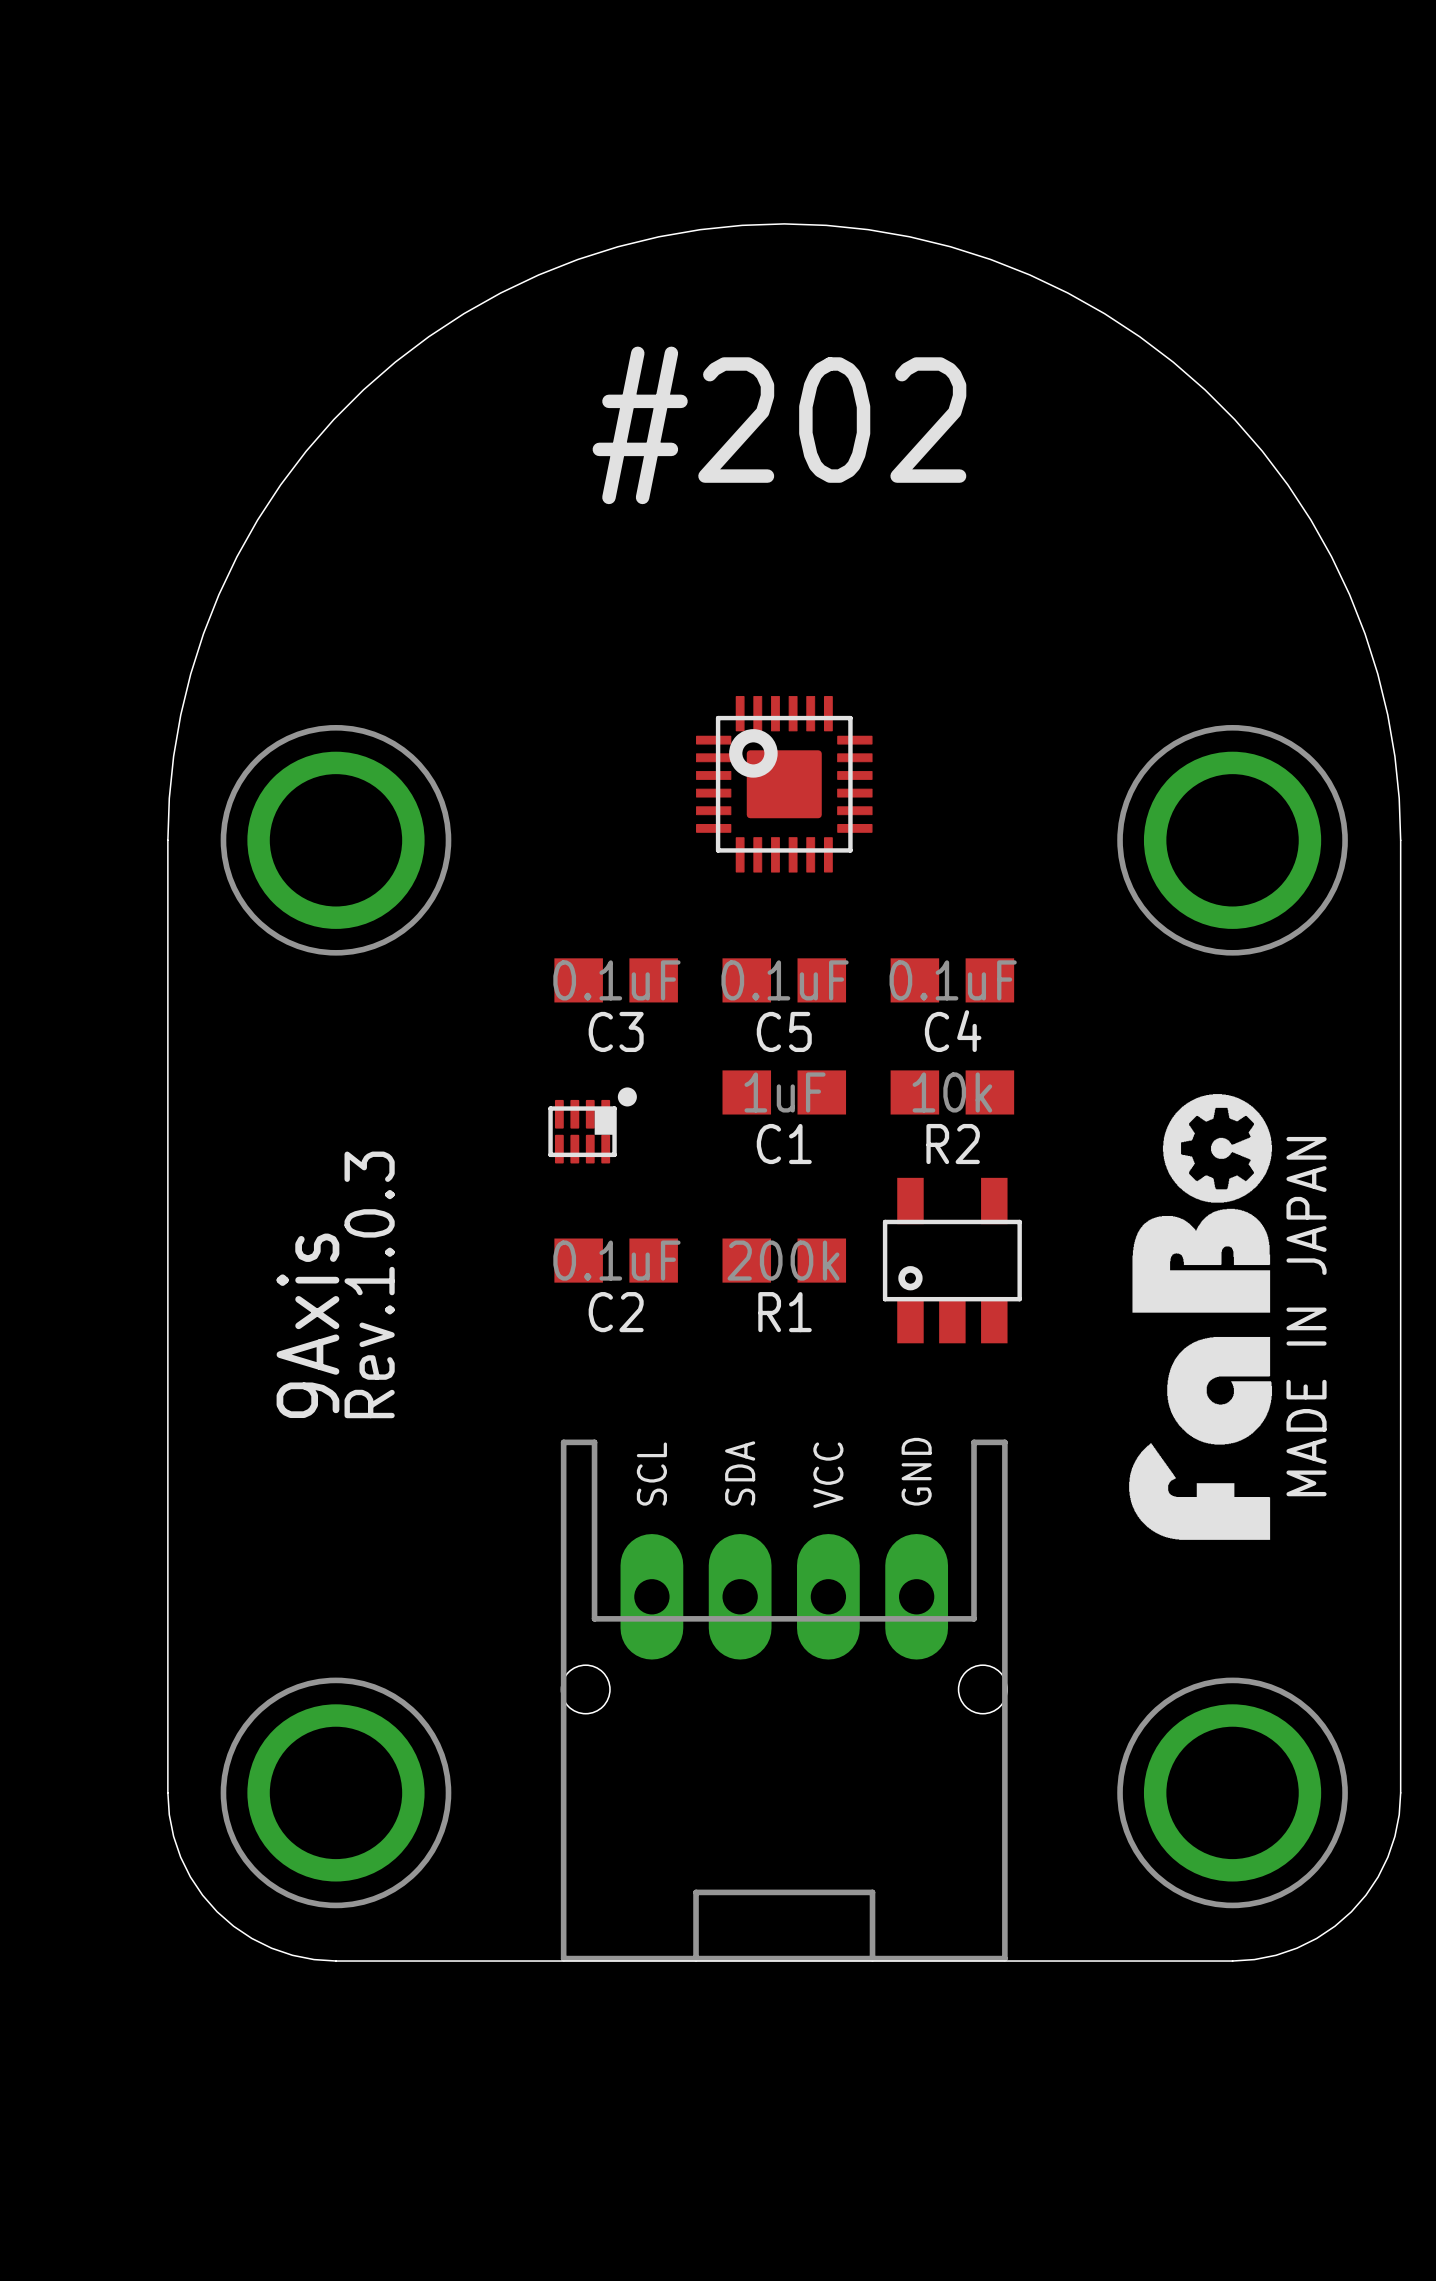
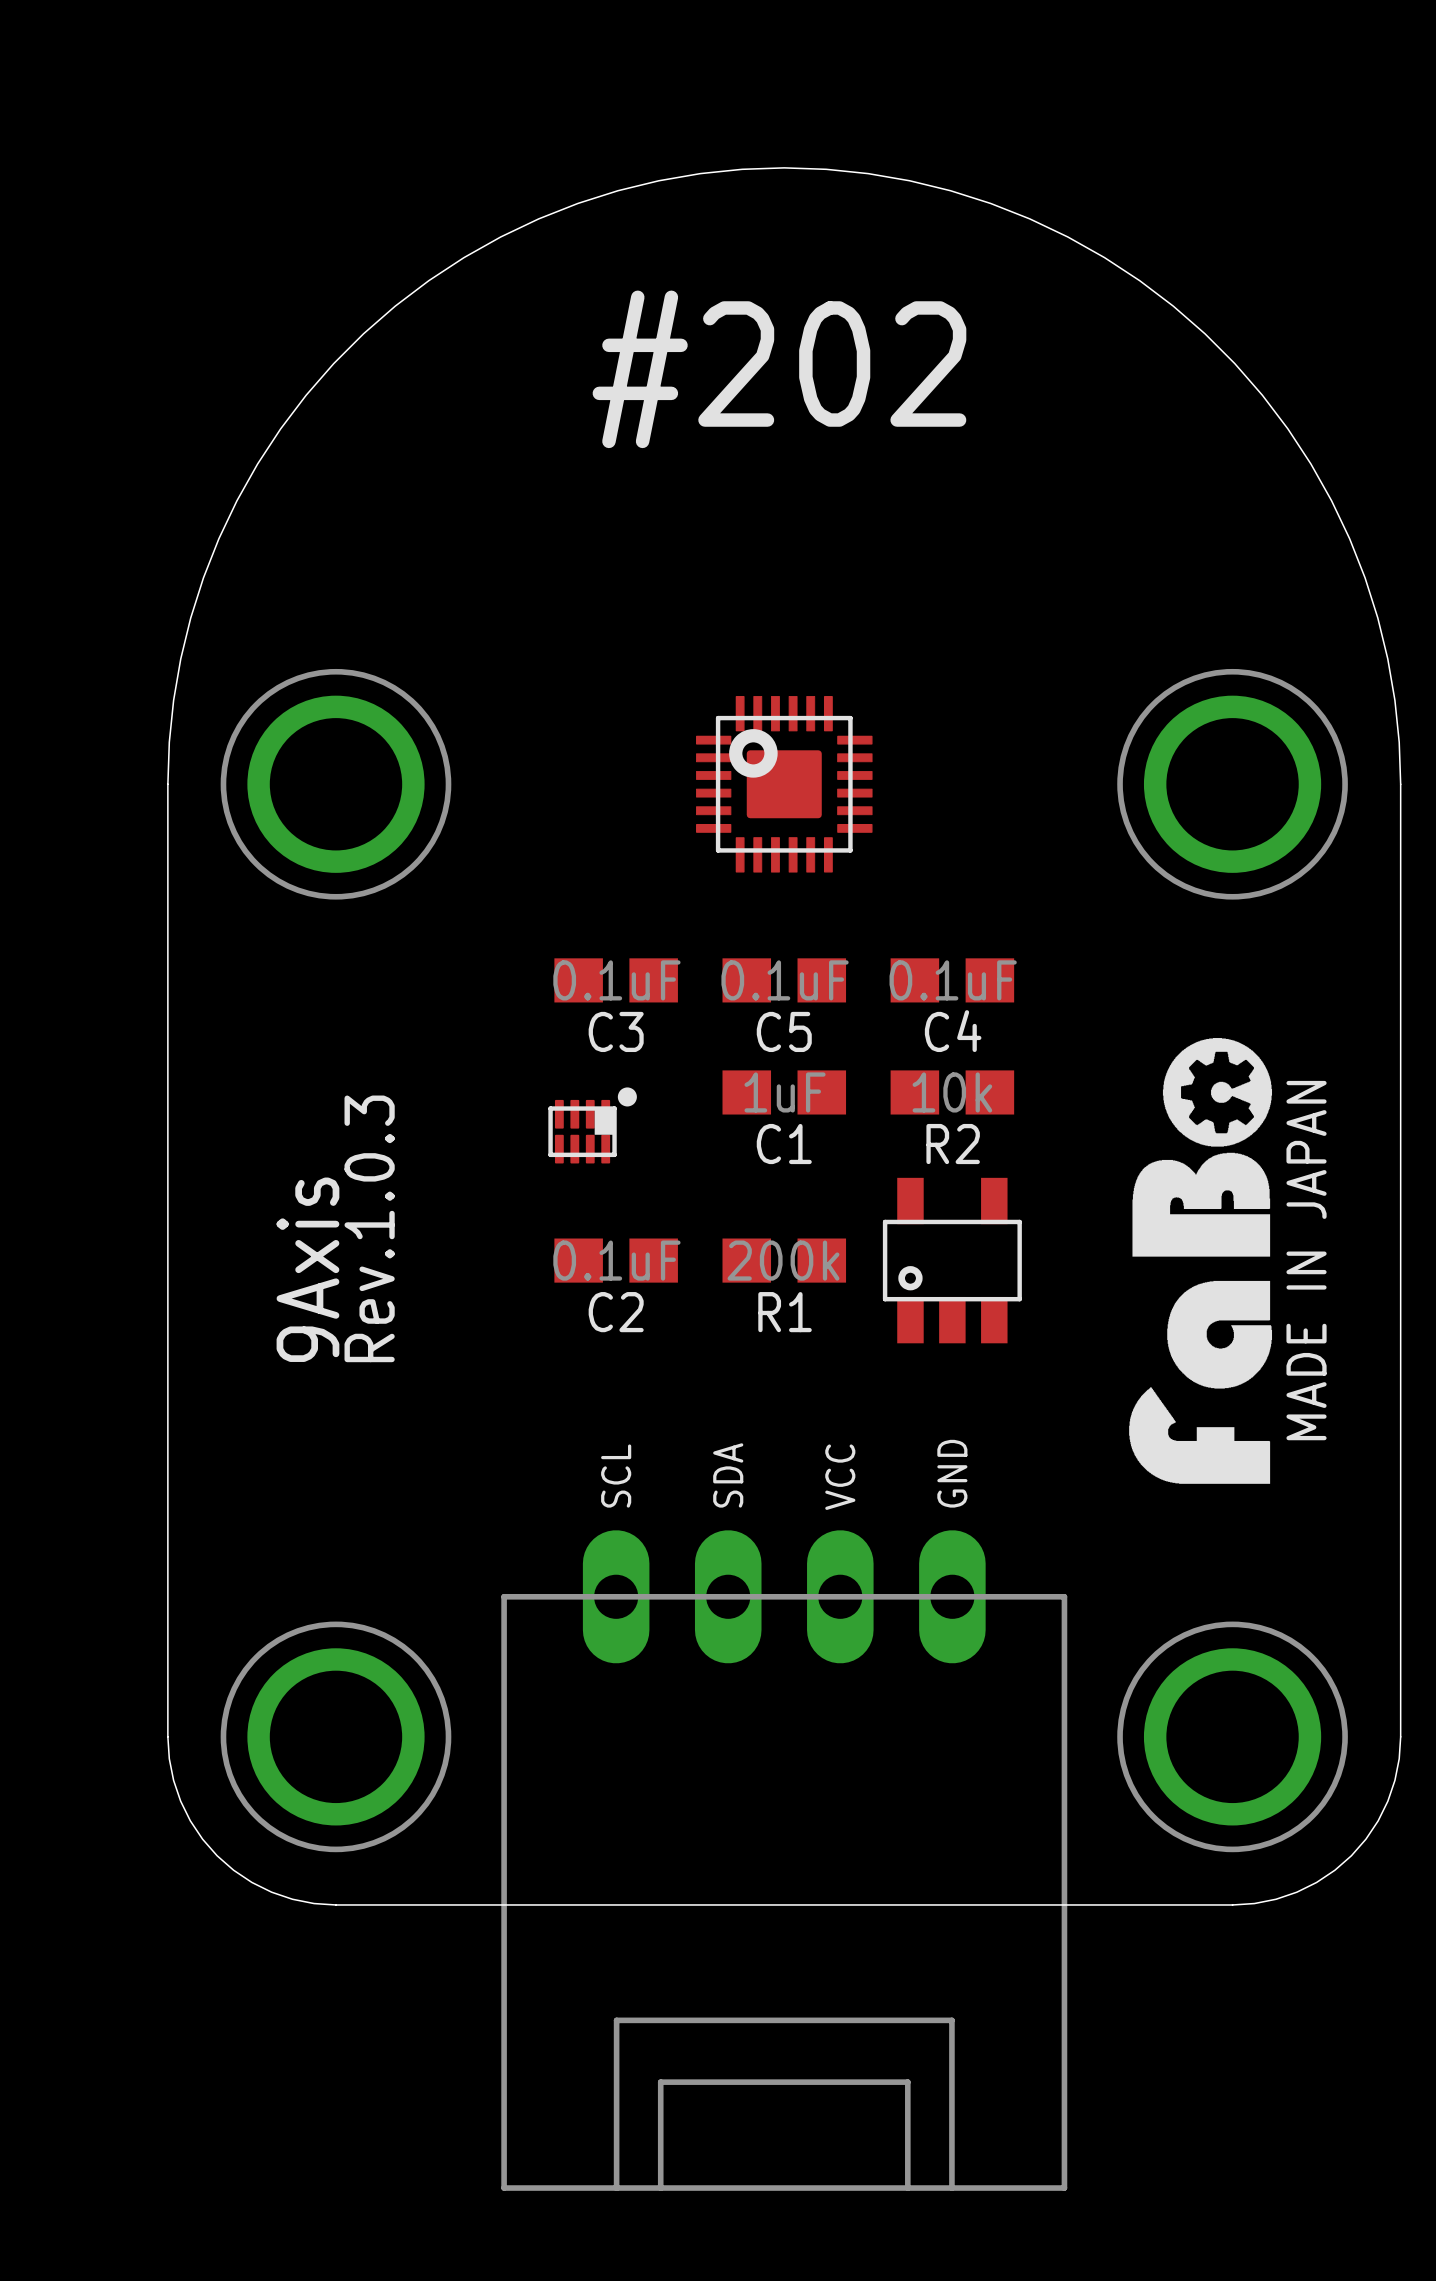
text position: #202 (779, 425) -> #202 (779, 369)
part: (784, 1092) -> none
part: none -> (784, 1179)
text position: Rev.1.0.3 (369, 1284) -> Rev.1.0.3 (369, 1228)
drawing position: (1200, 1316) -> (1200, 1260)
text position: MADE IN JAPAN (1306, 1316) -> MADE IN JAPAN (1306, 1260)
text position: 9Axis (307, 1325) -> 9Axis (307, 1269)

